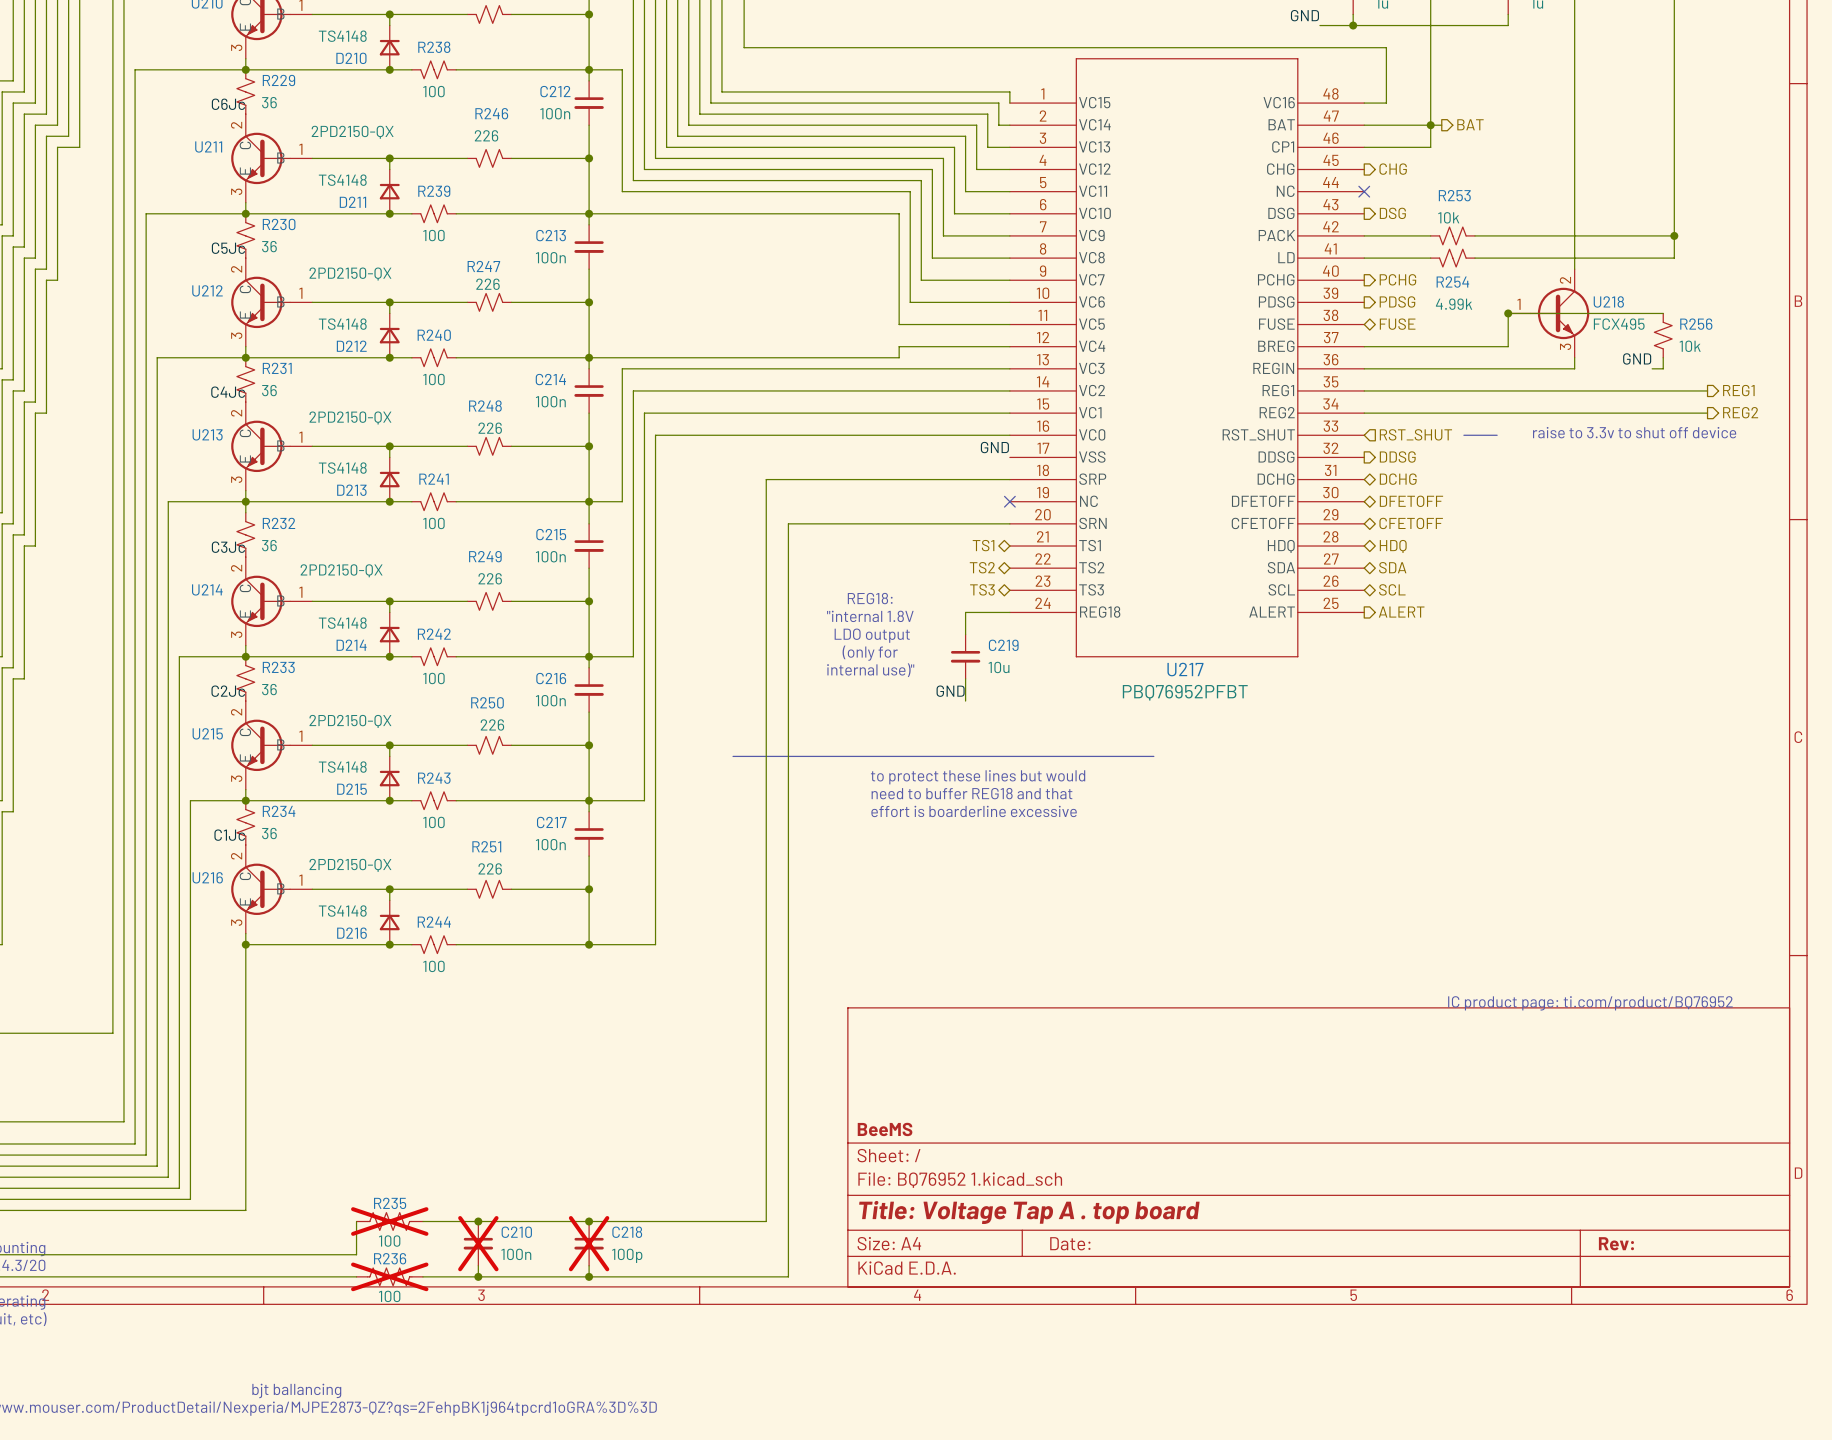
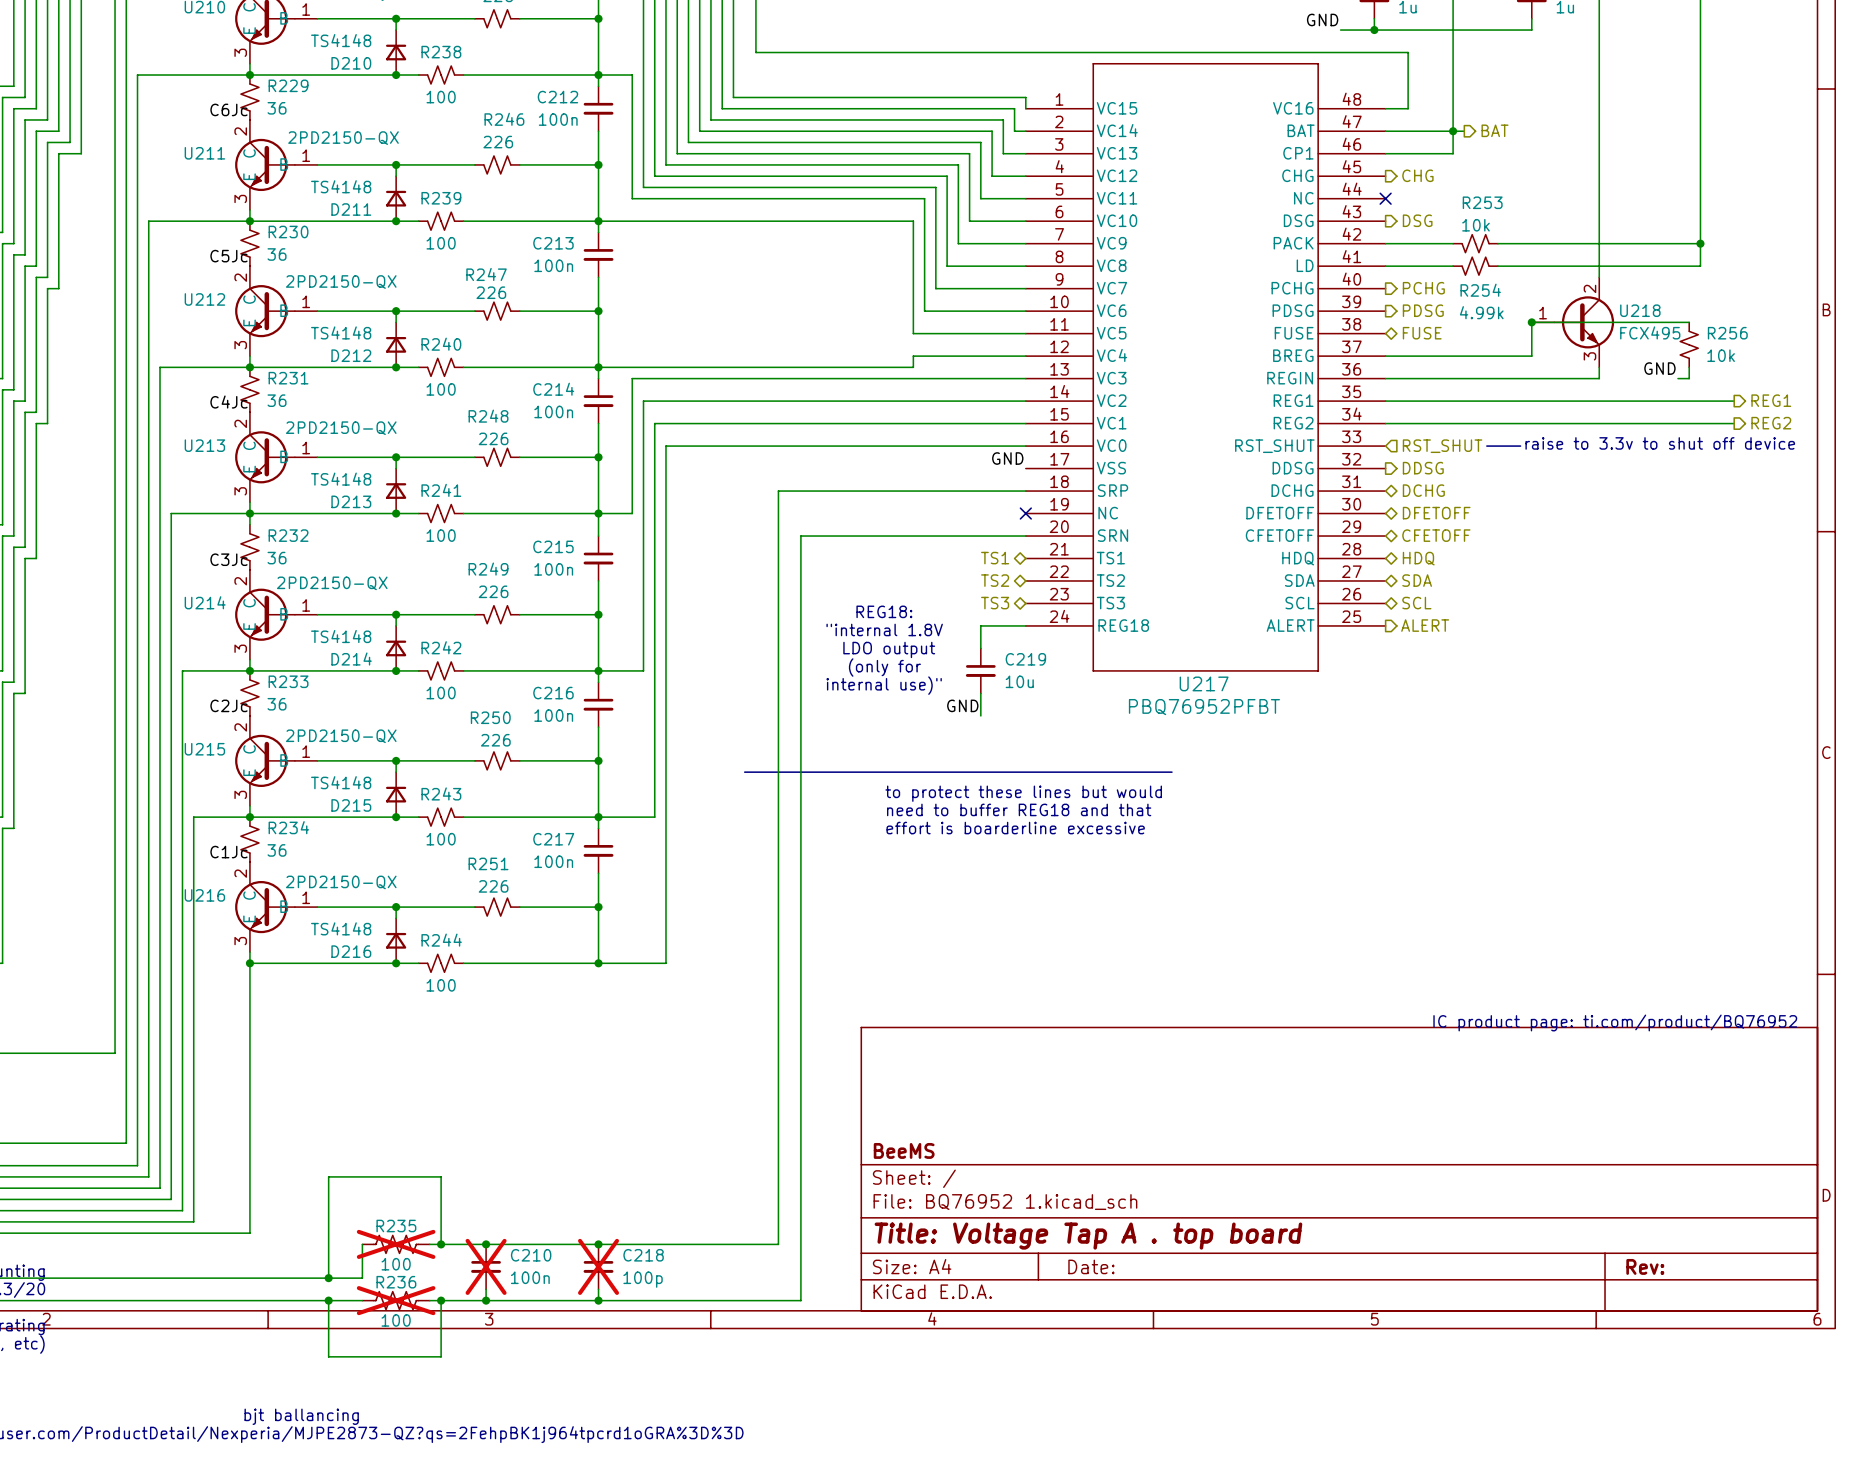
wire: none -> (441, 1244) (441, 1176) (328, 1176) (328, 1278)
junction: none -> (441, 1244)
junction: none -> (328, 1278)
wire: none -> (328, 1300) (328, 1356) (441, 1356) (441, 1300)
junction: none -> (328, 1300)
junction: none -> (441, 1300)

